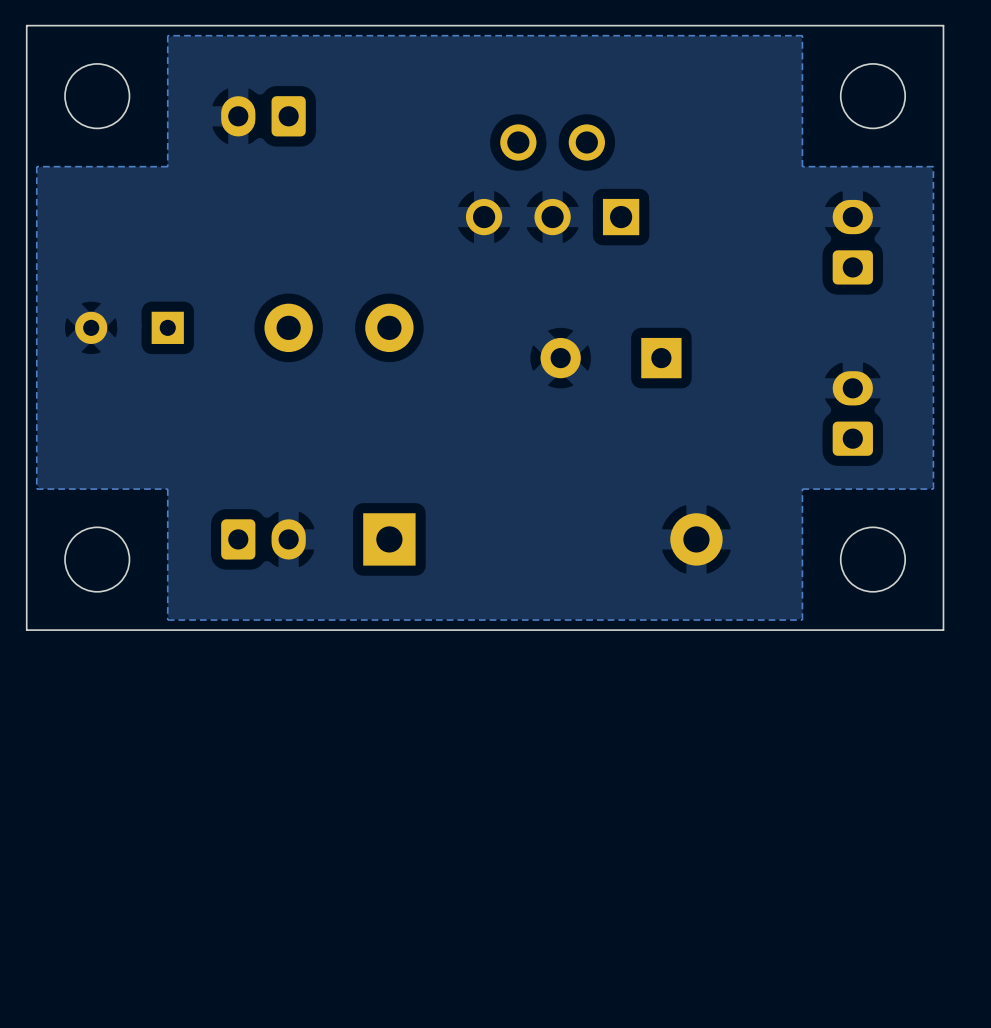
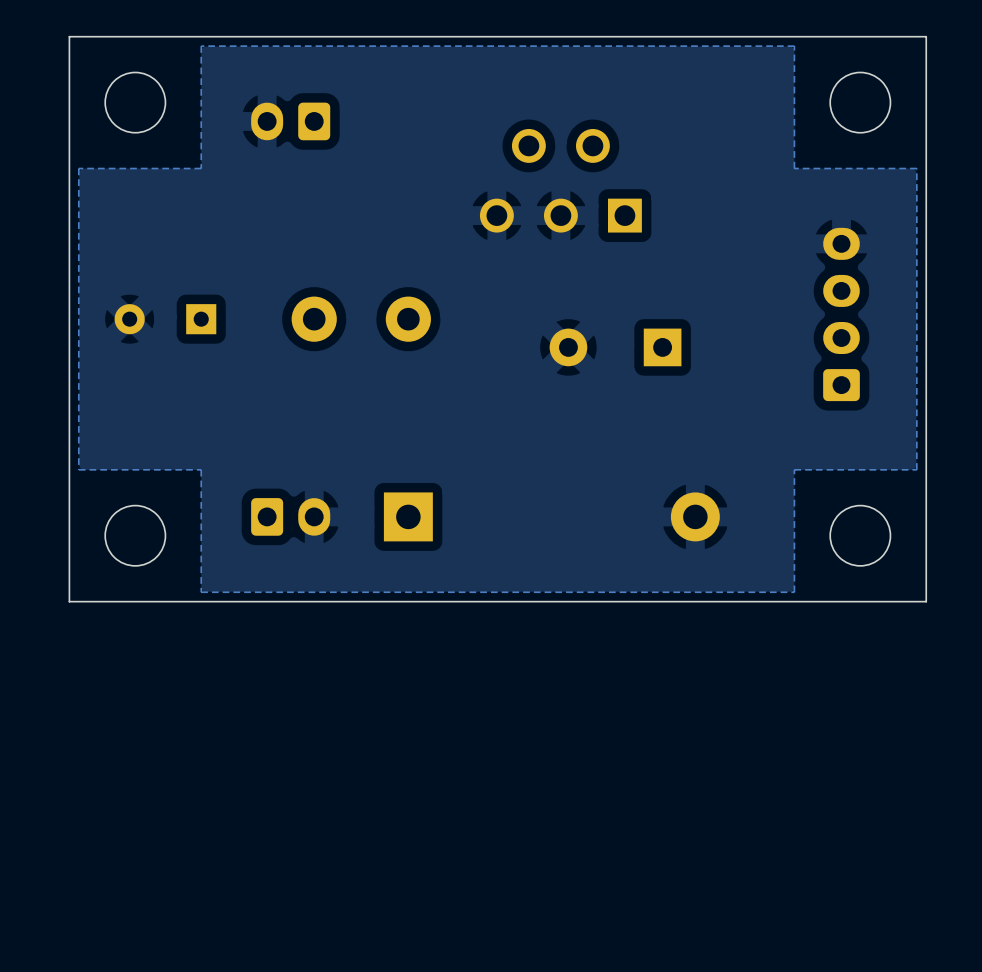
part: (852, 242) -> none
part: none -> (841, 314)
part: (852, 413) -> none

